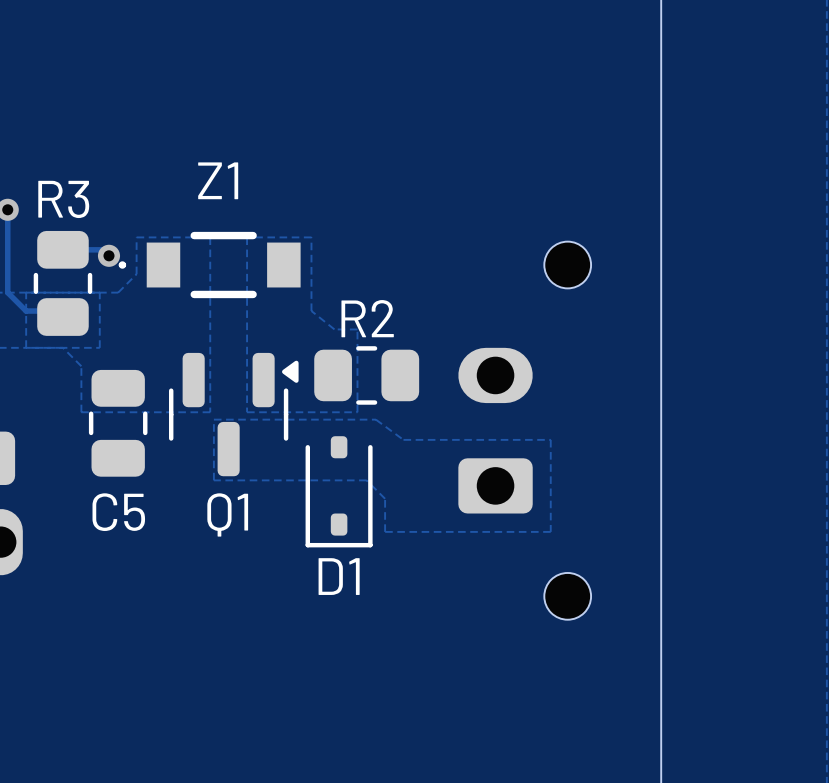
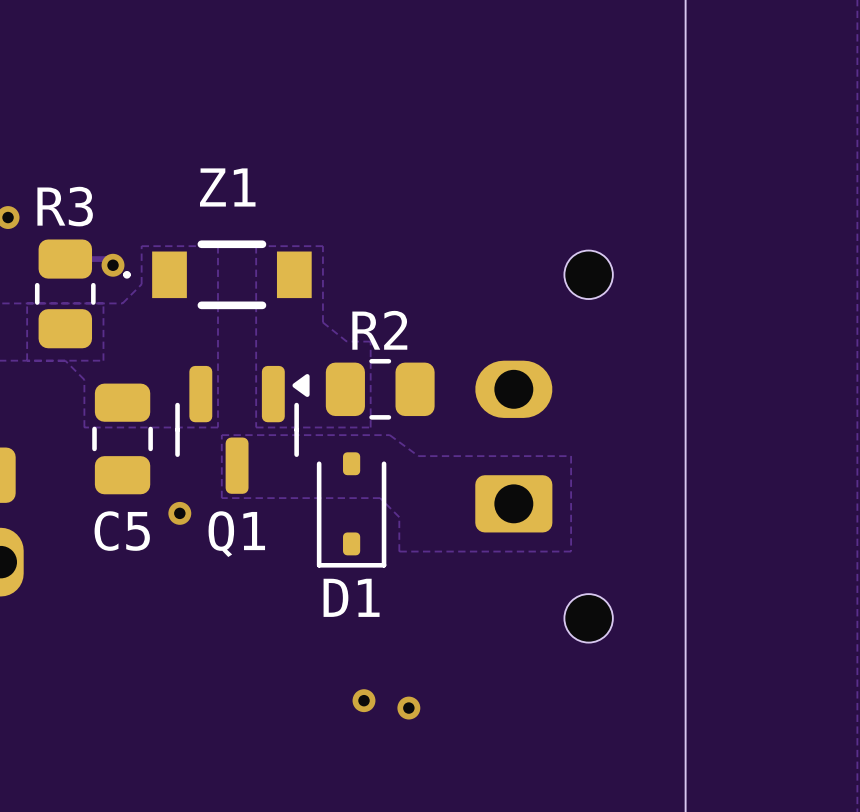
track: (7, 209) (7, 292) (26, 311) (56, 311) (62, 317) -> none
via: none -> (179, 513)
via: none -> (364, 700)
via: none -> (408, 708)

